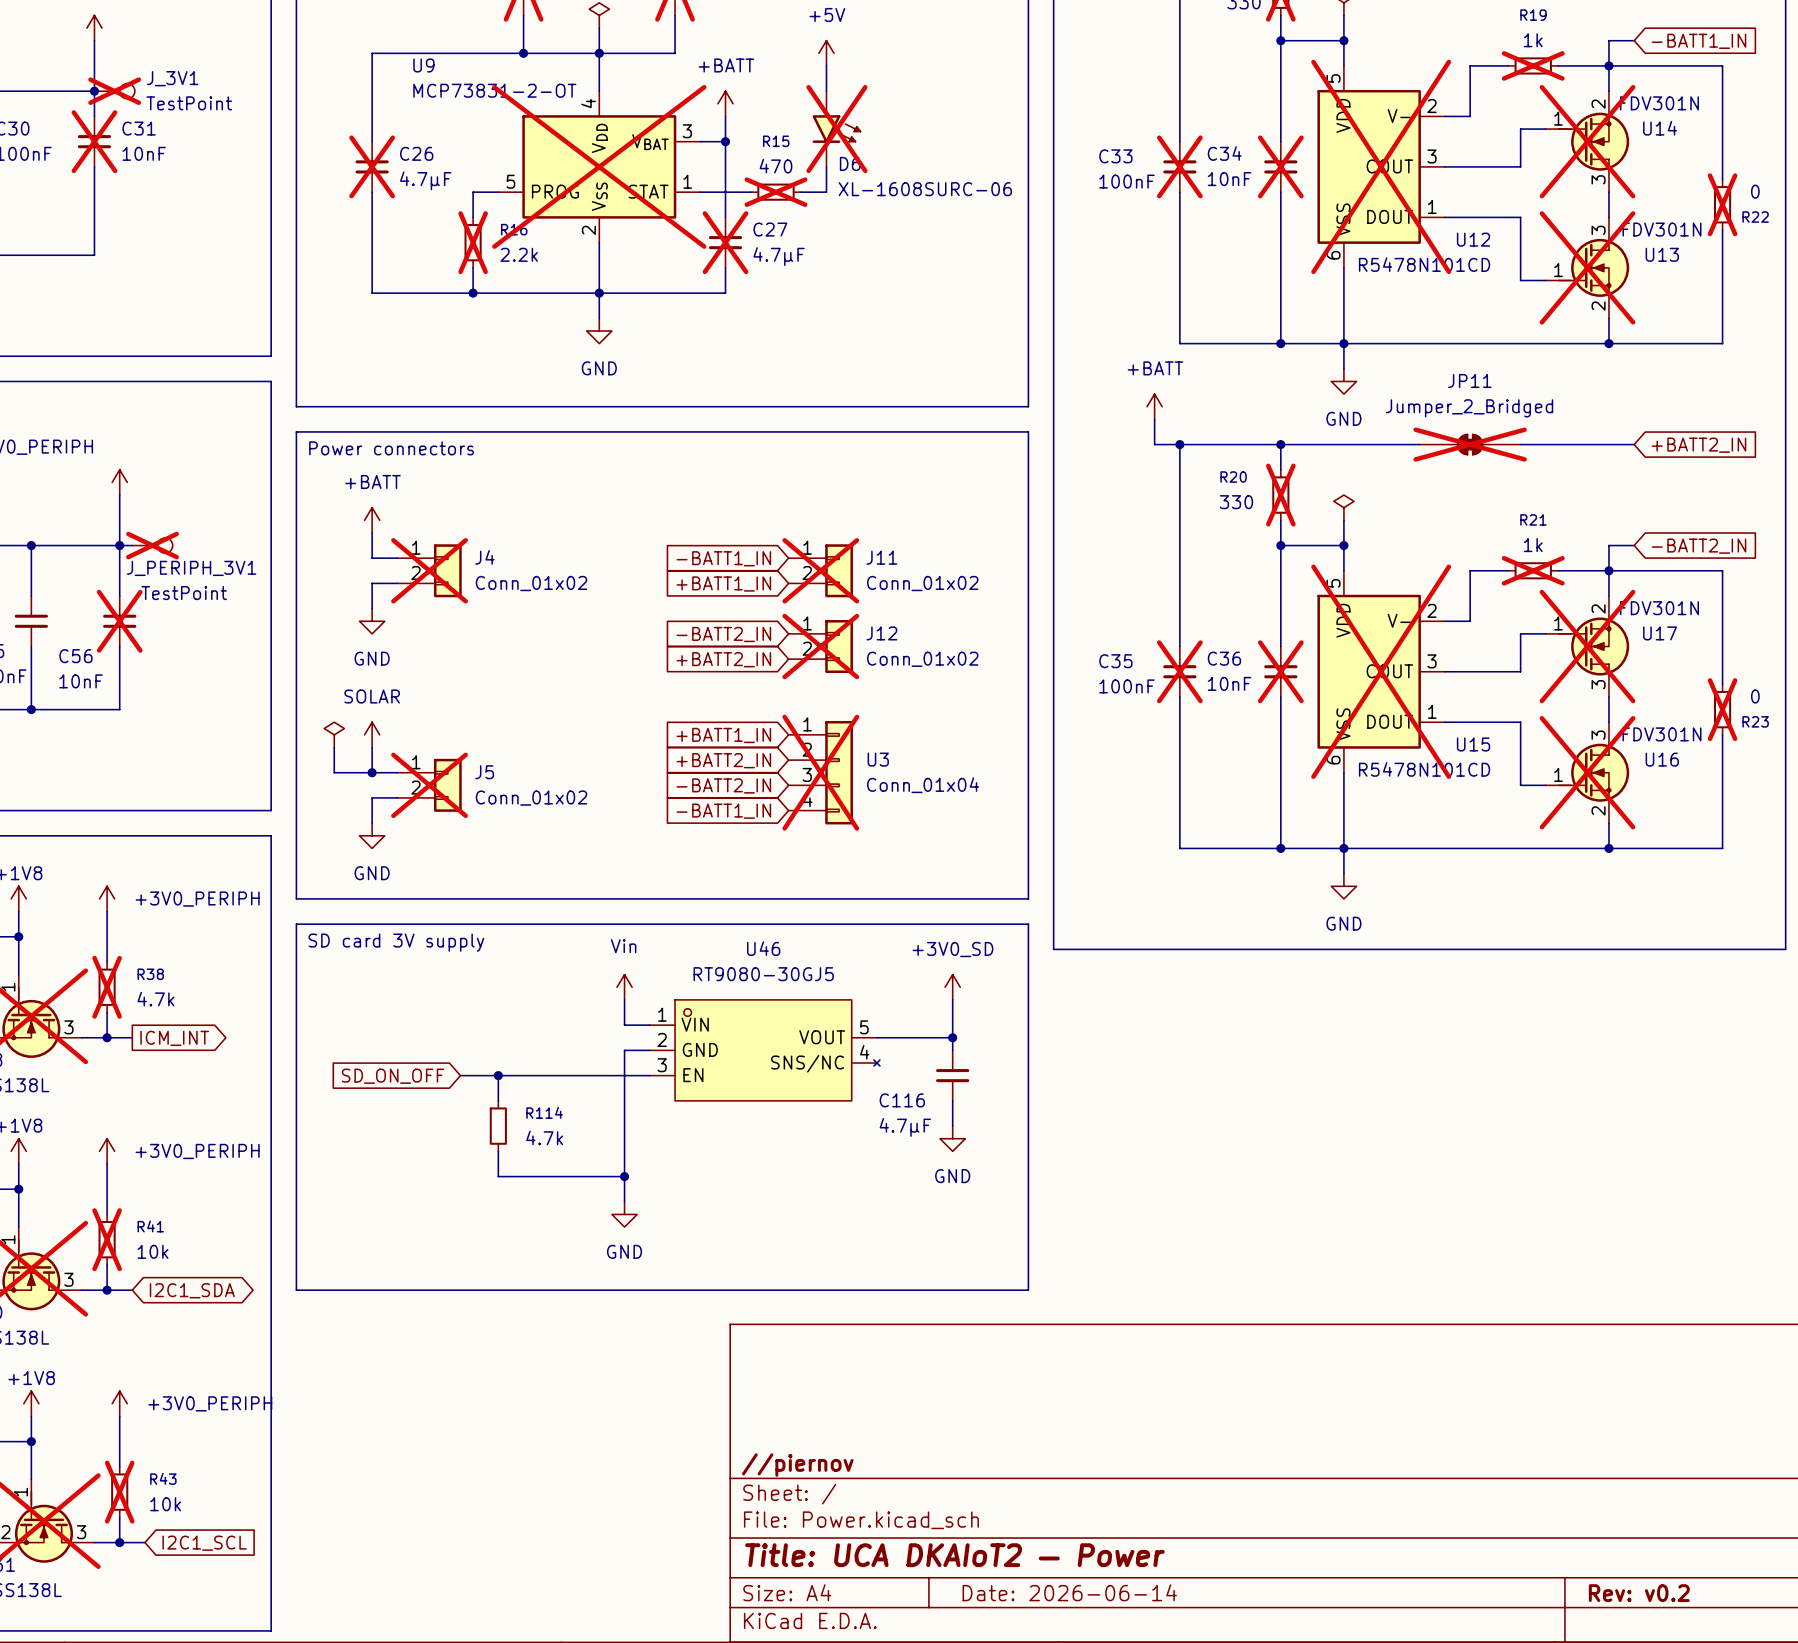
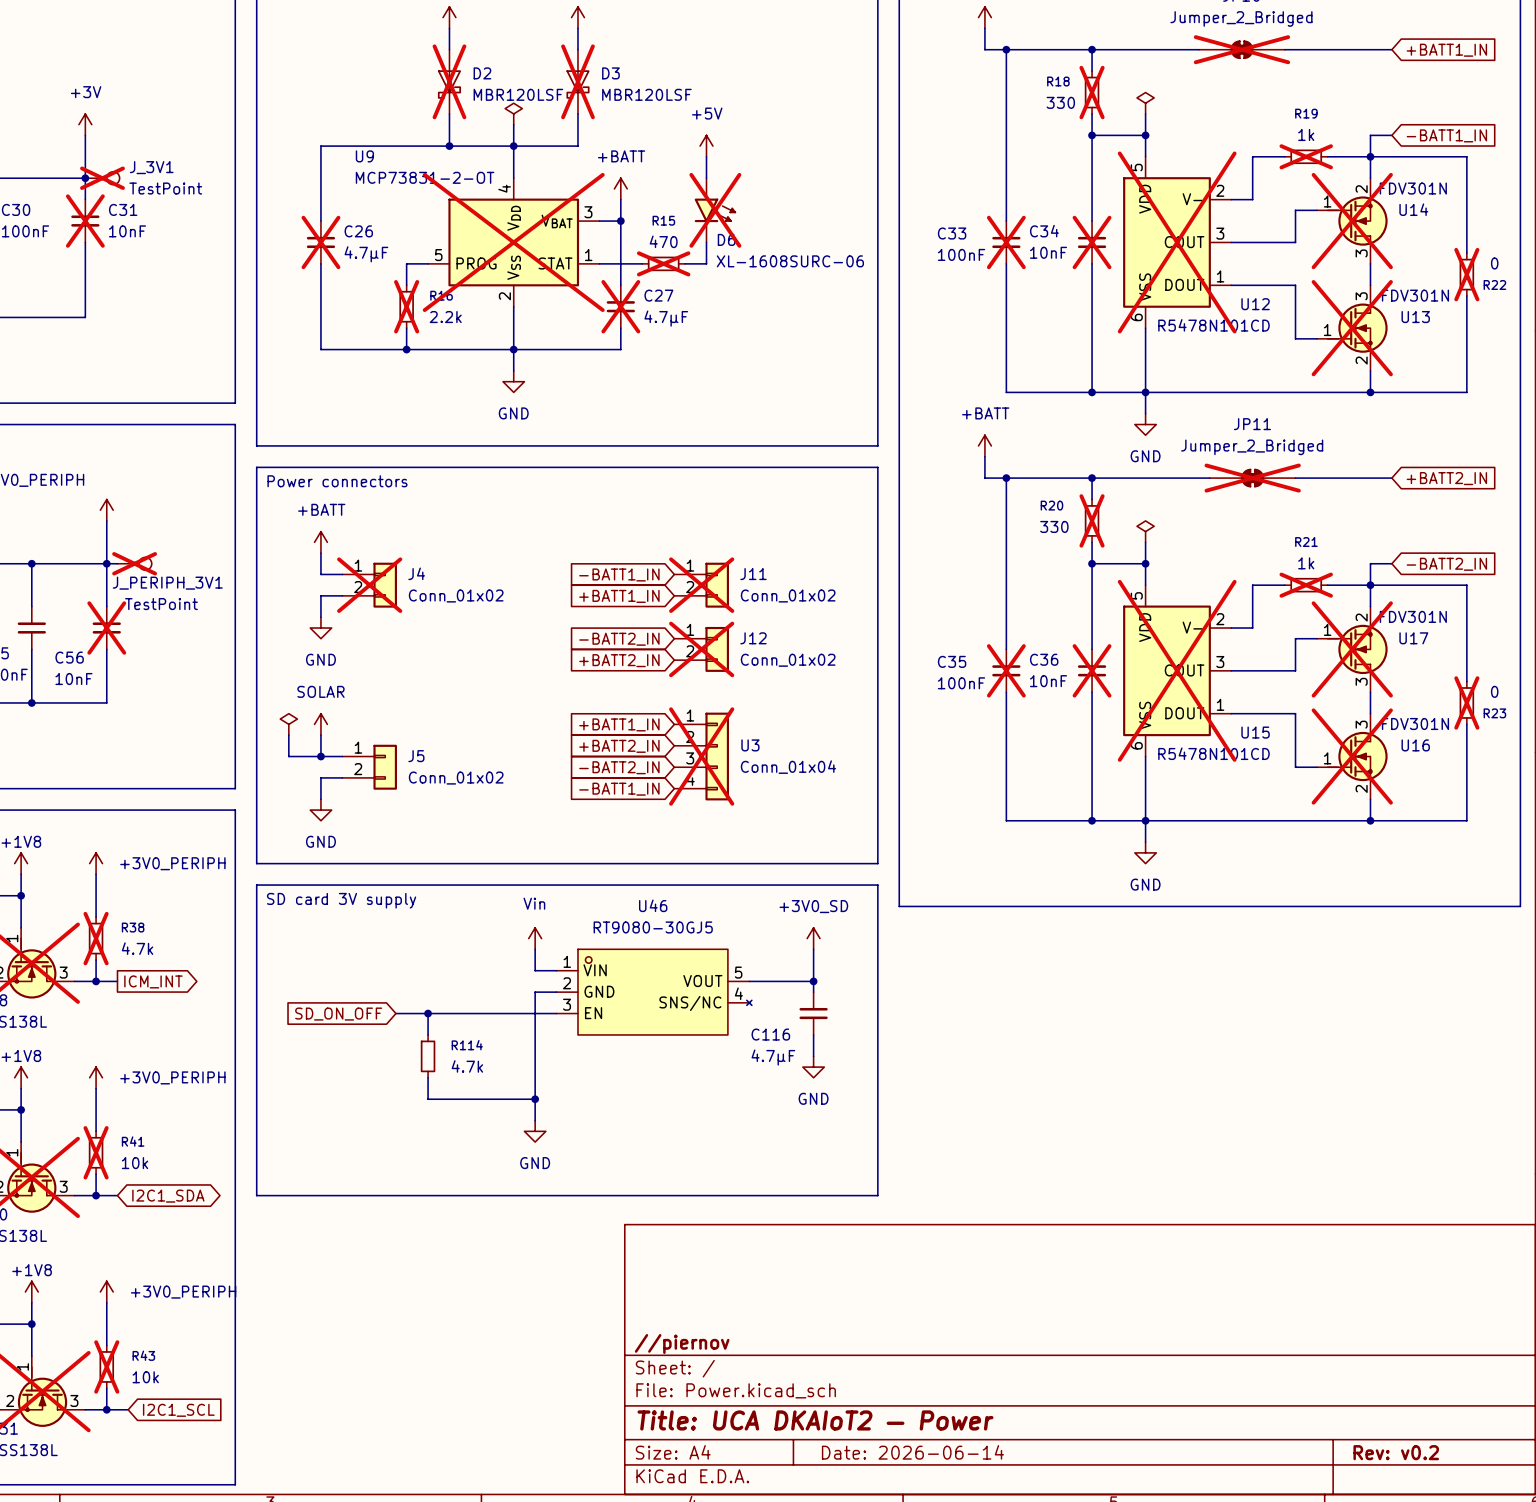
J5 do-not-place cross: (429, 785) -> none

